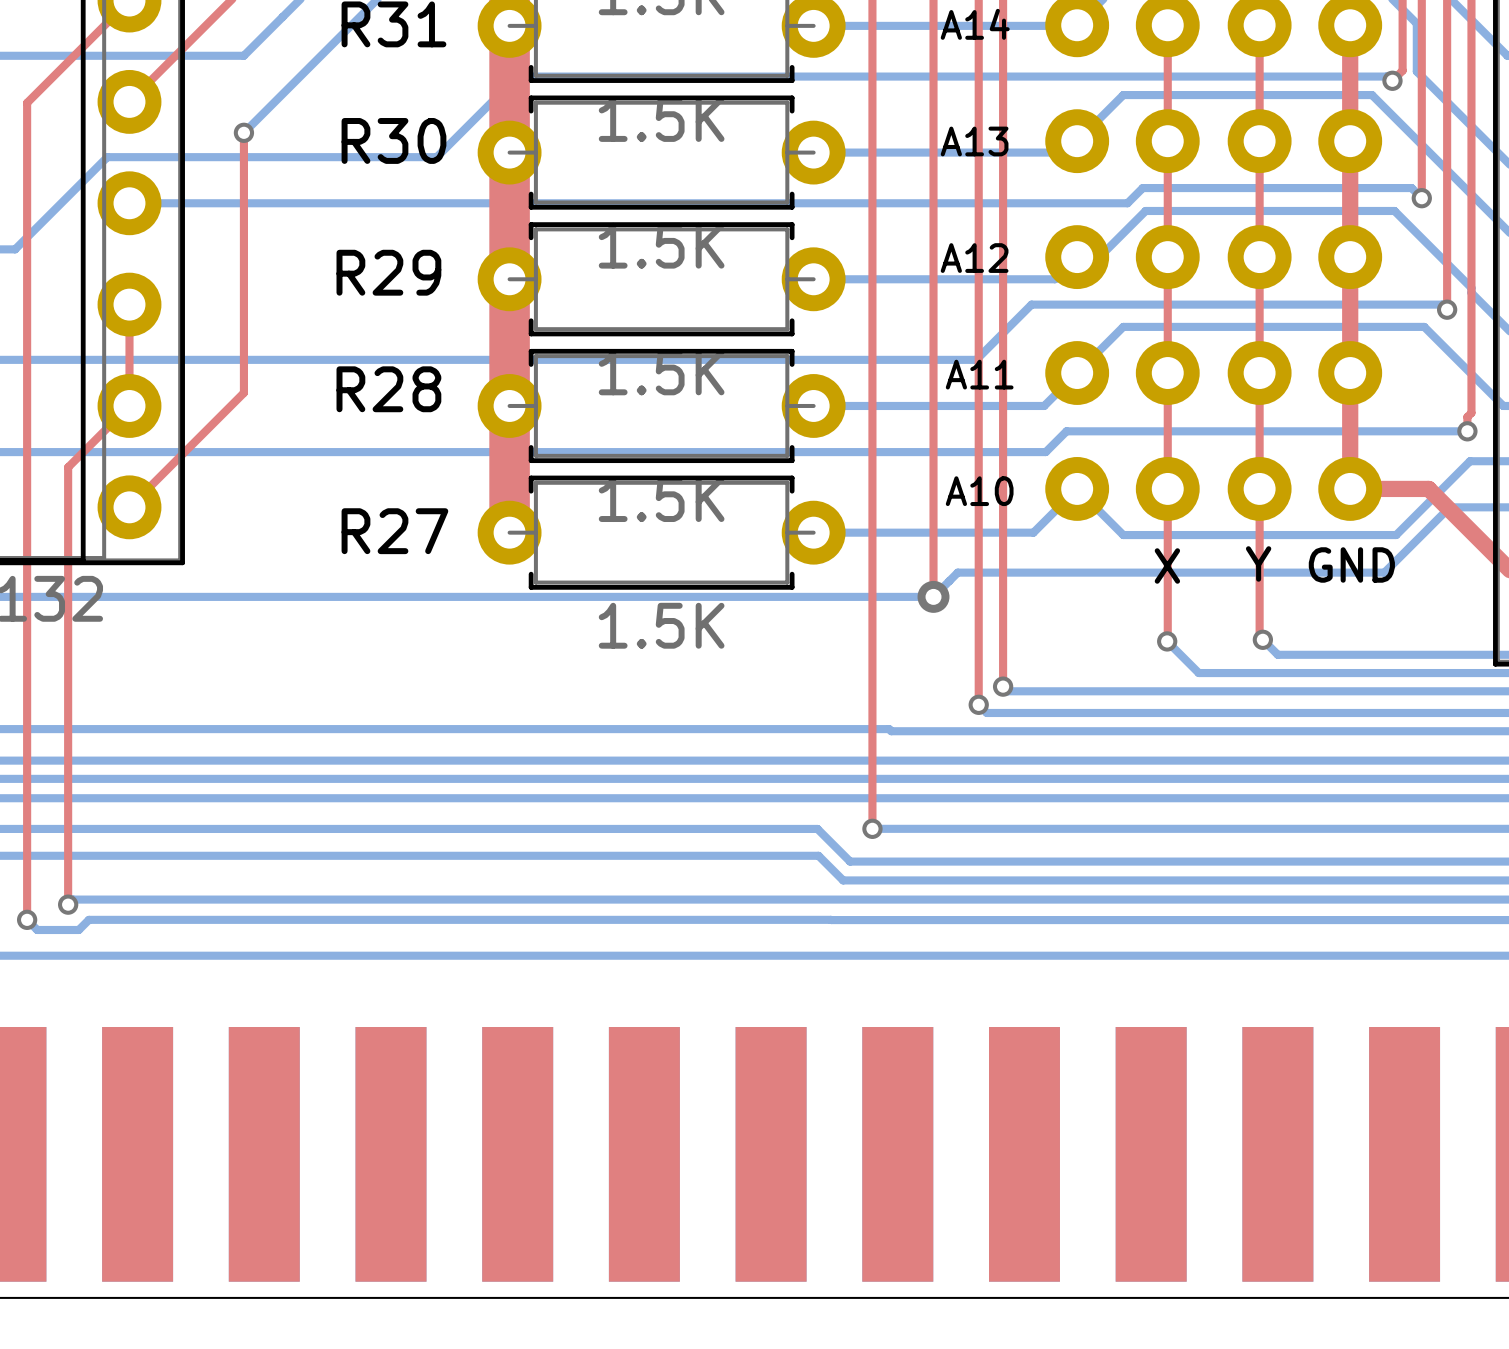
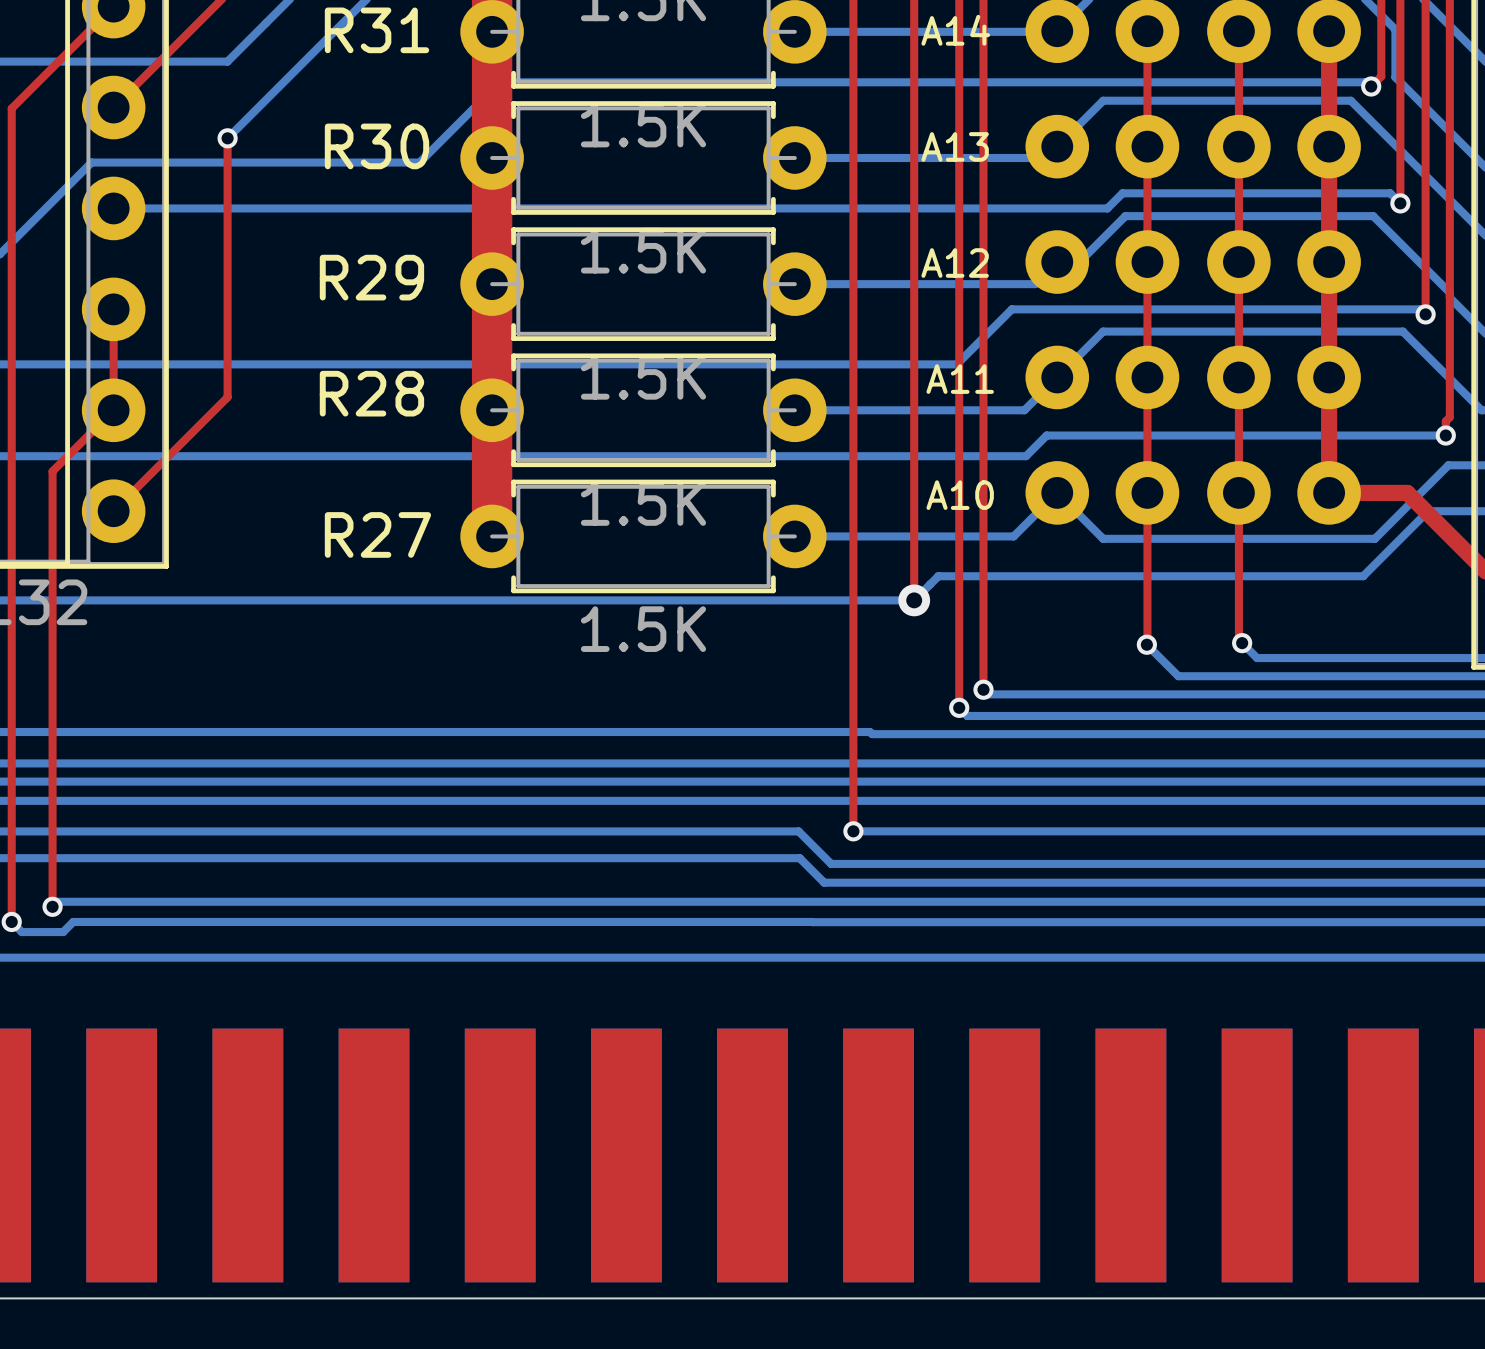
text: Y (1258, 563) -> none
text: GND (1351, 564) -> none
text: X (1167, 565) -> none

